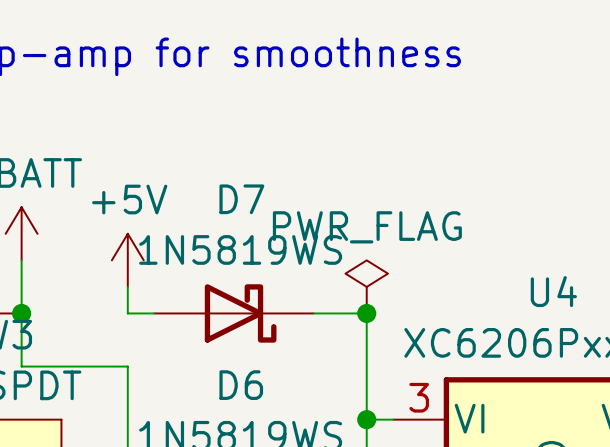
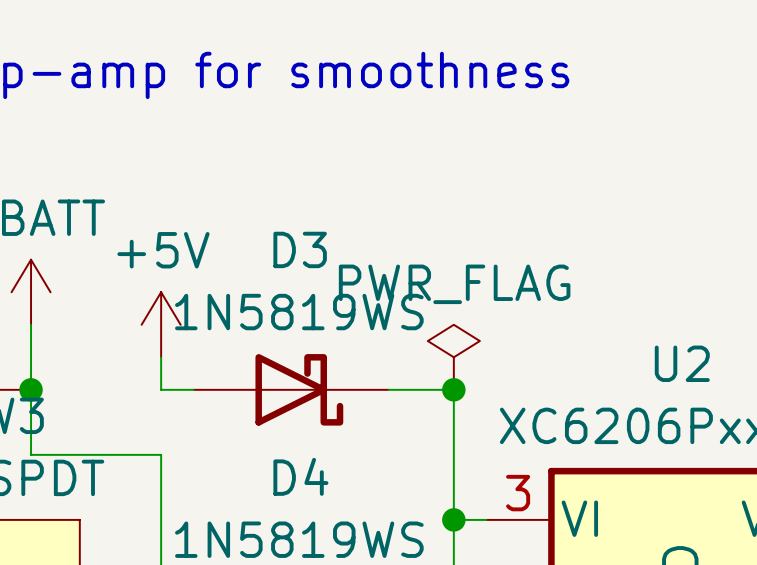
D7 name: D7 (241, 199) -> D3 (300, 249)
U4 name: U4 (553, 291) -> U2 (682, 363)
D6 name: D6 (241, 385) -> D4 (300, 476)

